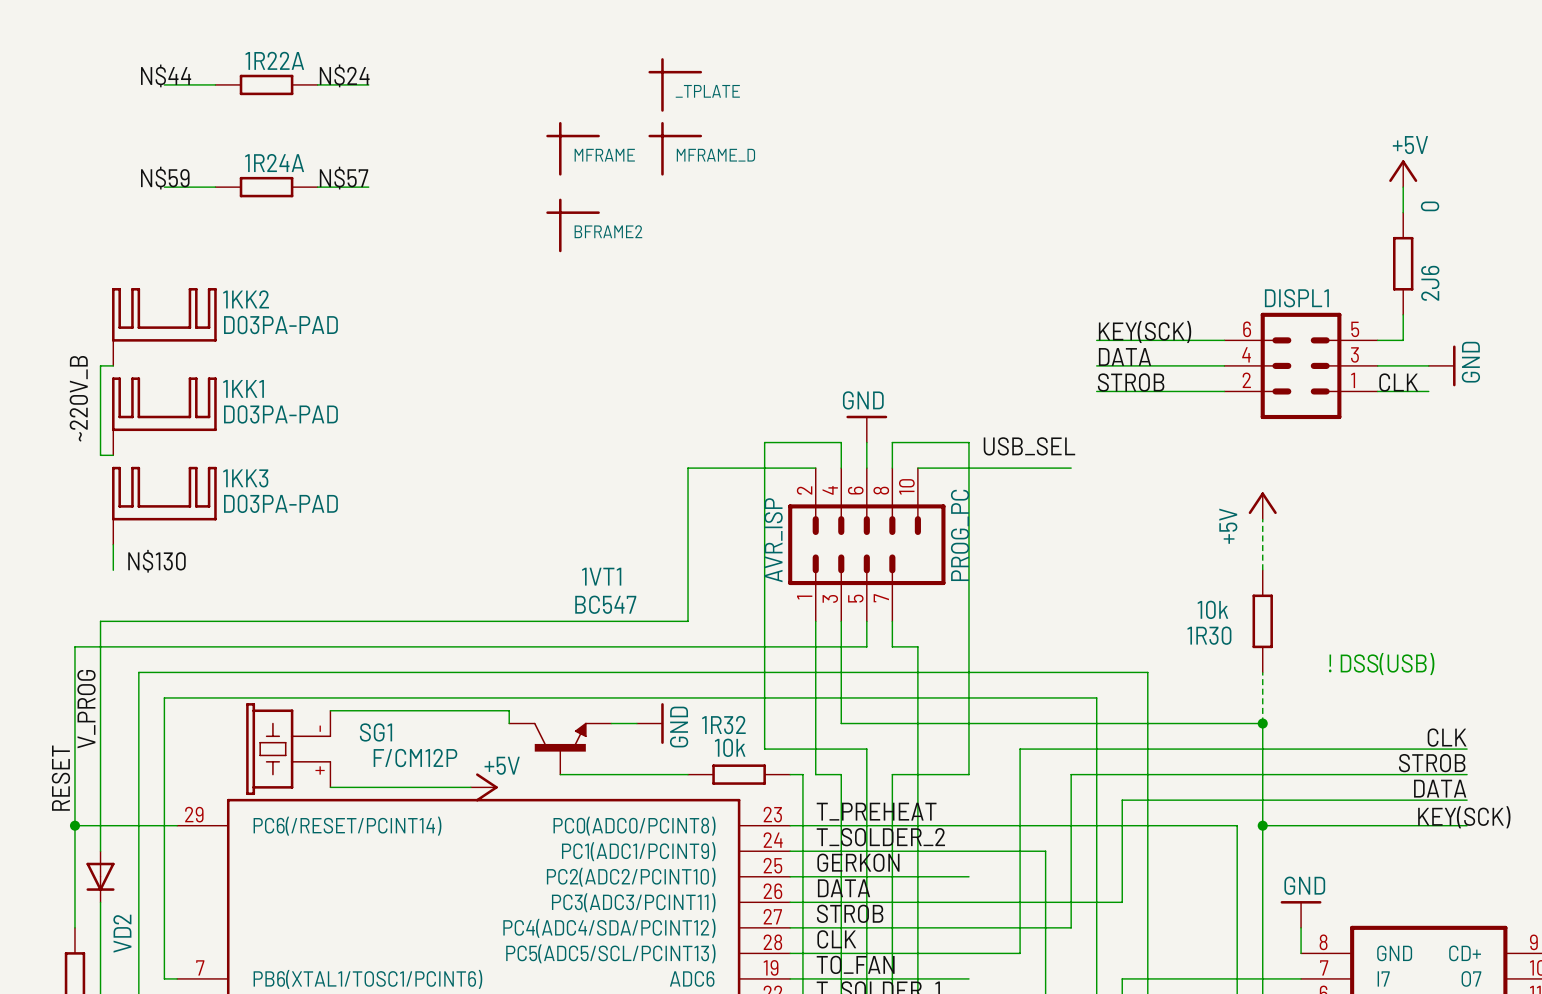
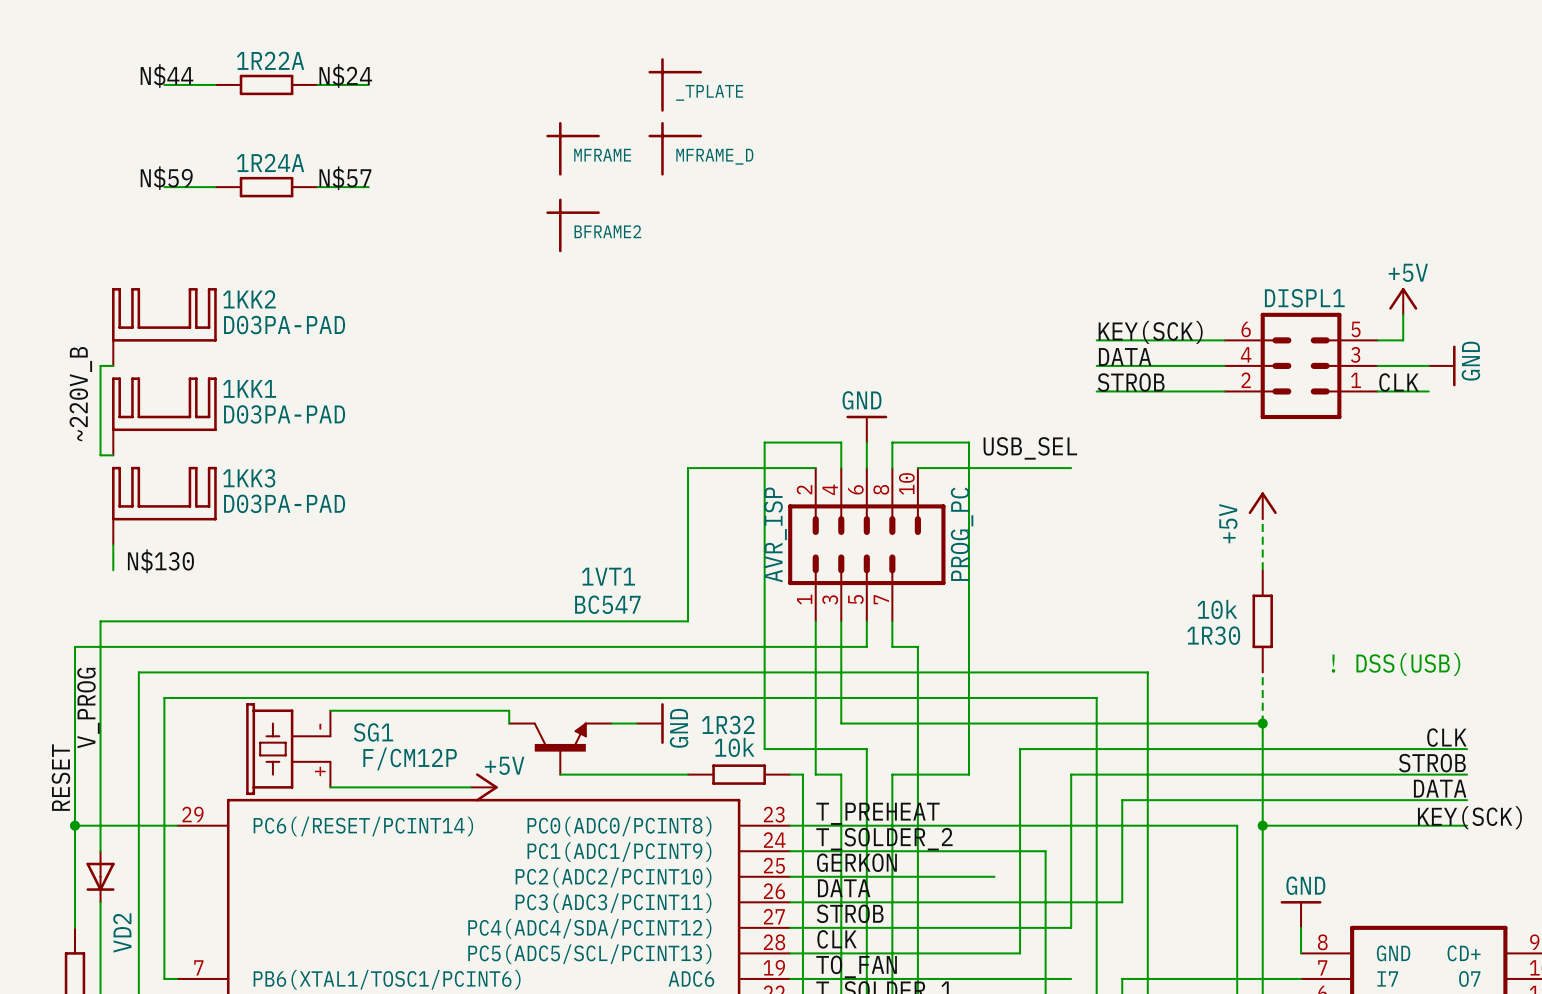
power symbol position: +5V (1403, 173) -> +5V (1403, 301)
wire: (1403, 187) (1403, 212) -> none
2J6: 0 (1403, 263) -> none
wire: none -> (968, 876) (994, 876)
wire: none -> (968, 978) (1071, 978)

